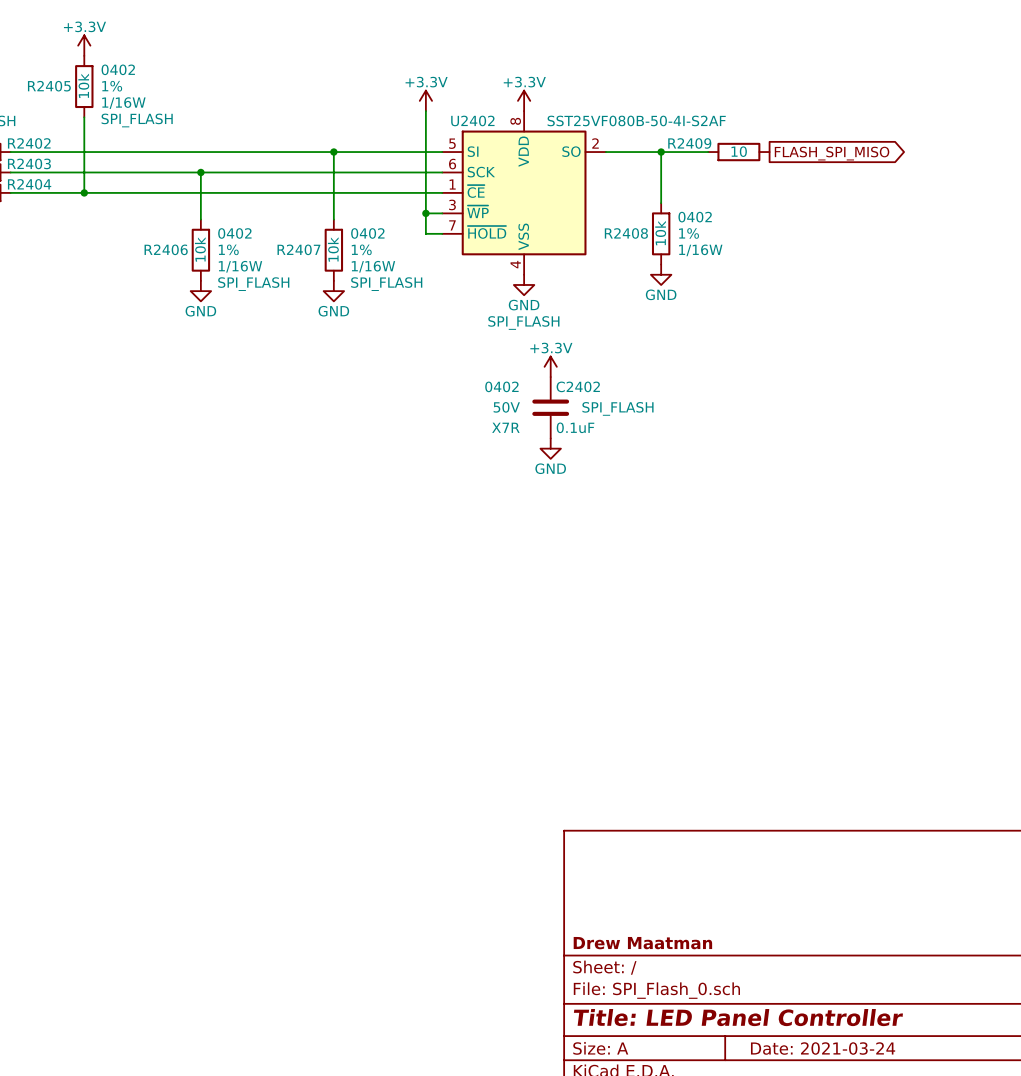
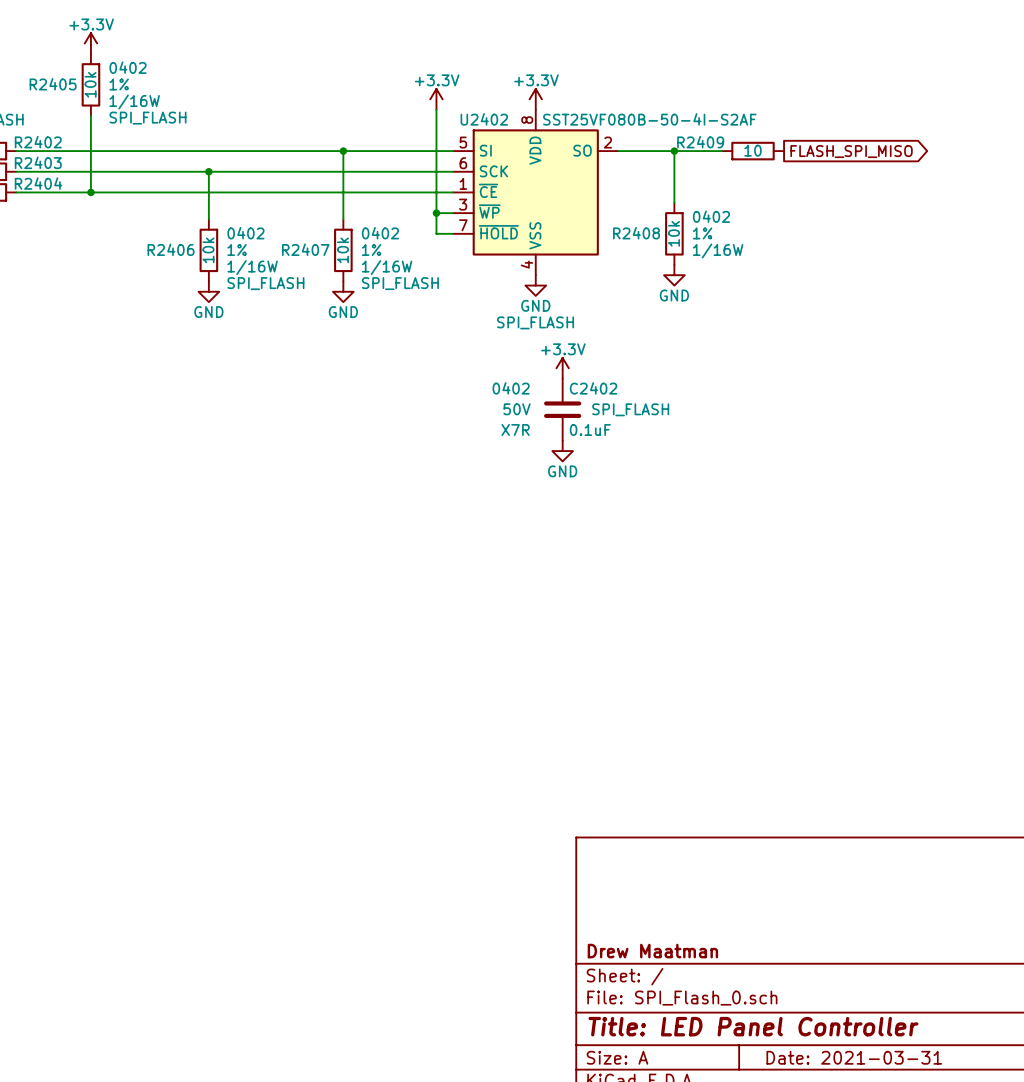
title block: Date: 2021-03-24 (823, 1048) -> Date: 2021-03-31 (854, 1057)

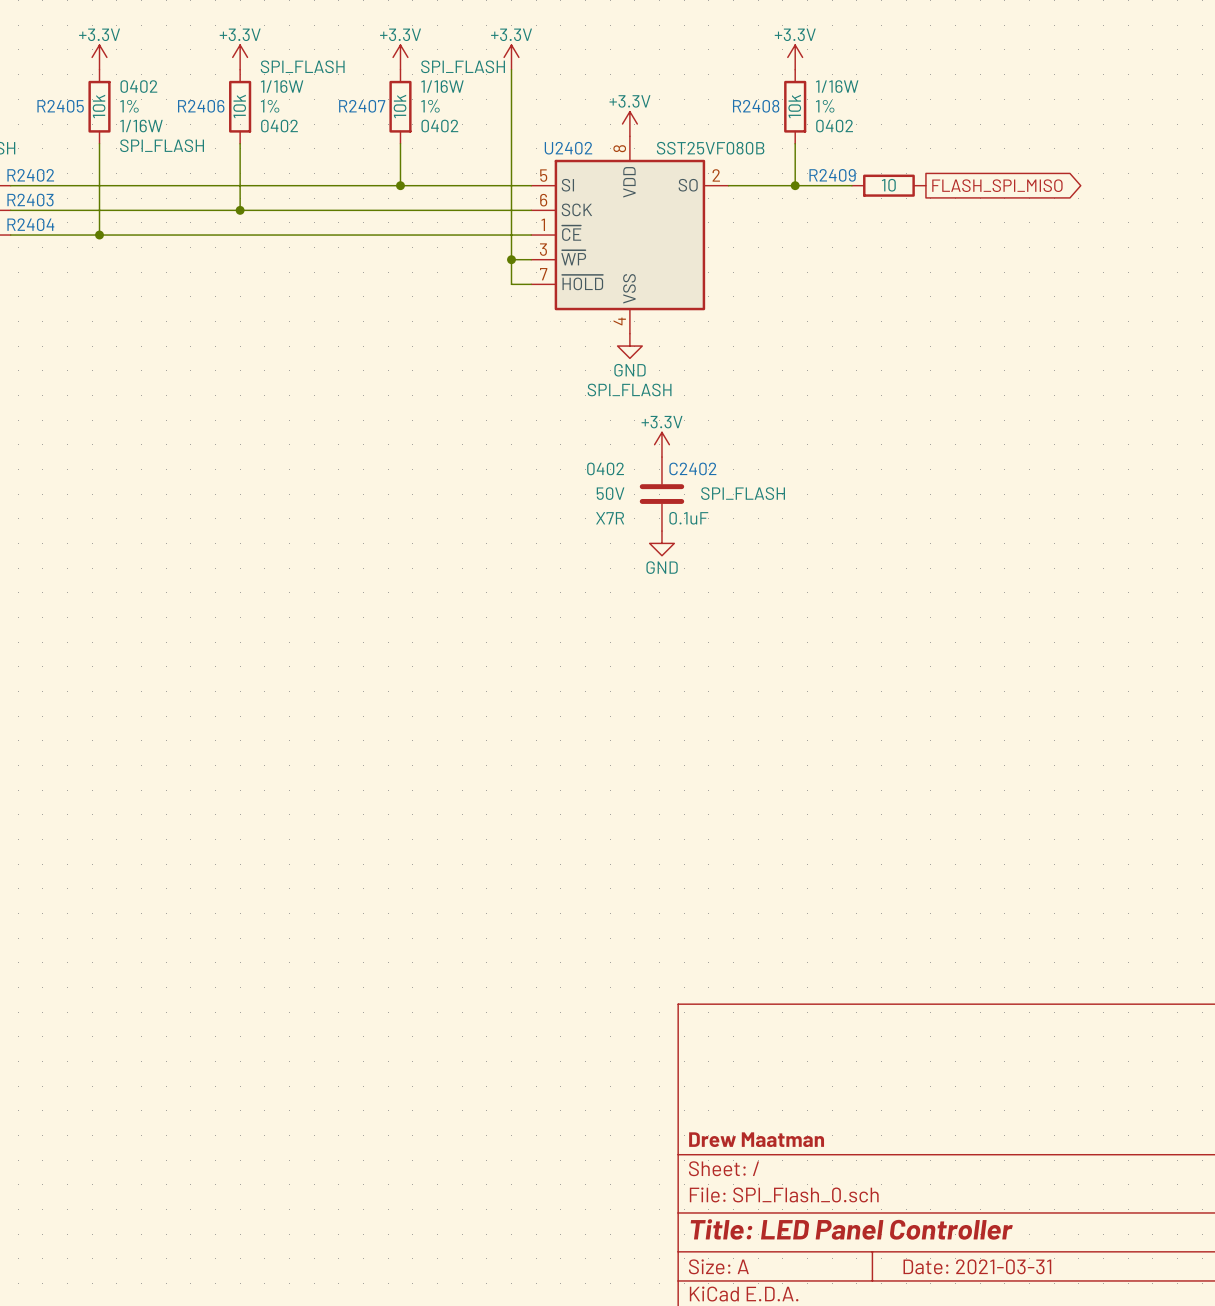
power symbol: none -> +3.3V (240, 57)
power symbol: none -> +3.3V (400, 57)
power symbol: none -> +3.3V (511, 57)
power symbol: none -> +3.3V (795, 57)
wire: none -> (511, 69) (511, 136)
power symbol: +3.3V (436, 99) -> none
U2402 value: SST25VF080B-50-4I-S2AF (649, 119) -> SST25VF080B (710, 148)
wire: (343, 151) (343, 219) -> (400, 185) (400, 143)
wire: (674, 151) (674, 202) -> (795, 185) (795, 143)
wire: (208, 171) (208, 219) -> (240, 210) (240, 143)
R2408 text position: 0402 (711, 216) -> 0402 (834, 126)
R2406 text position: 0402 (245, 233) -> 0402 (279, 126)
R2407 text position: 0402 (380, 233) -> 0402 (439, 126)
R2408 position: (674, 233) -> (795, 106)
R2406 position: (208, 250) -> (240, 106)
R2407 position: (343, 250) -> (400, 106)
R2408 text position: 1/16W (718, 250) -> 1/16W (837, 86)
R2406 text position: 1/16W (252, 267) -> 1/16W (282, 86)
R2407 text position: 1/16W (387, 267) -> 1/16W (442, 86)
power symbol: GND (674, 275) -> none
R2406 text position: SPI_FLASH (265, 283) -> SPI_FLASH (302, 66)
R2407 text position: SPI_FLASH (400, 283) -> SPI_FLASH (463, 66)
power symbol: GND (208, 291) -> none
power symbol: GND (343, 291) -> none

